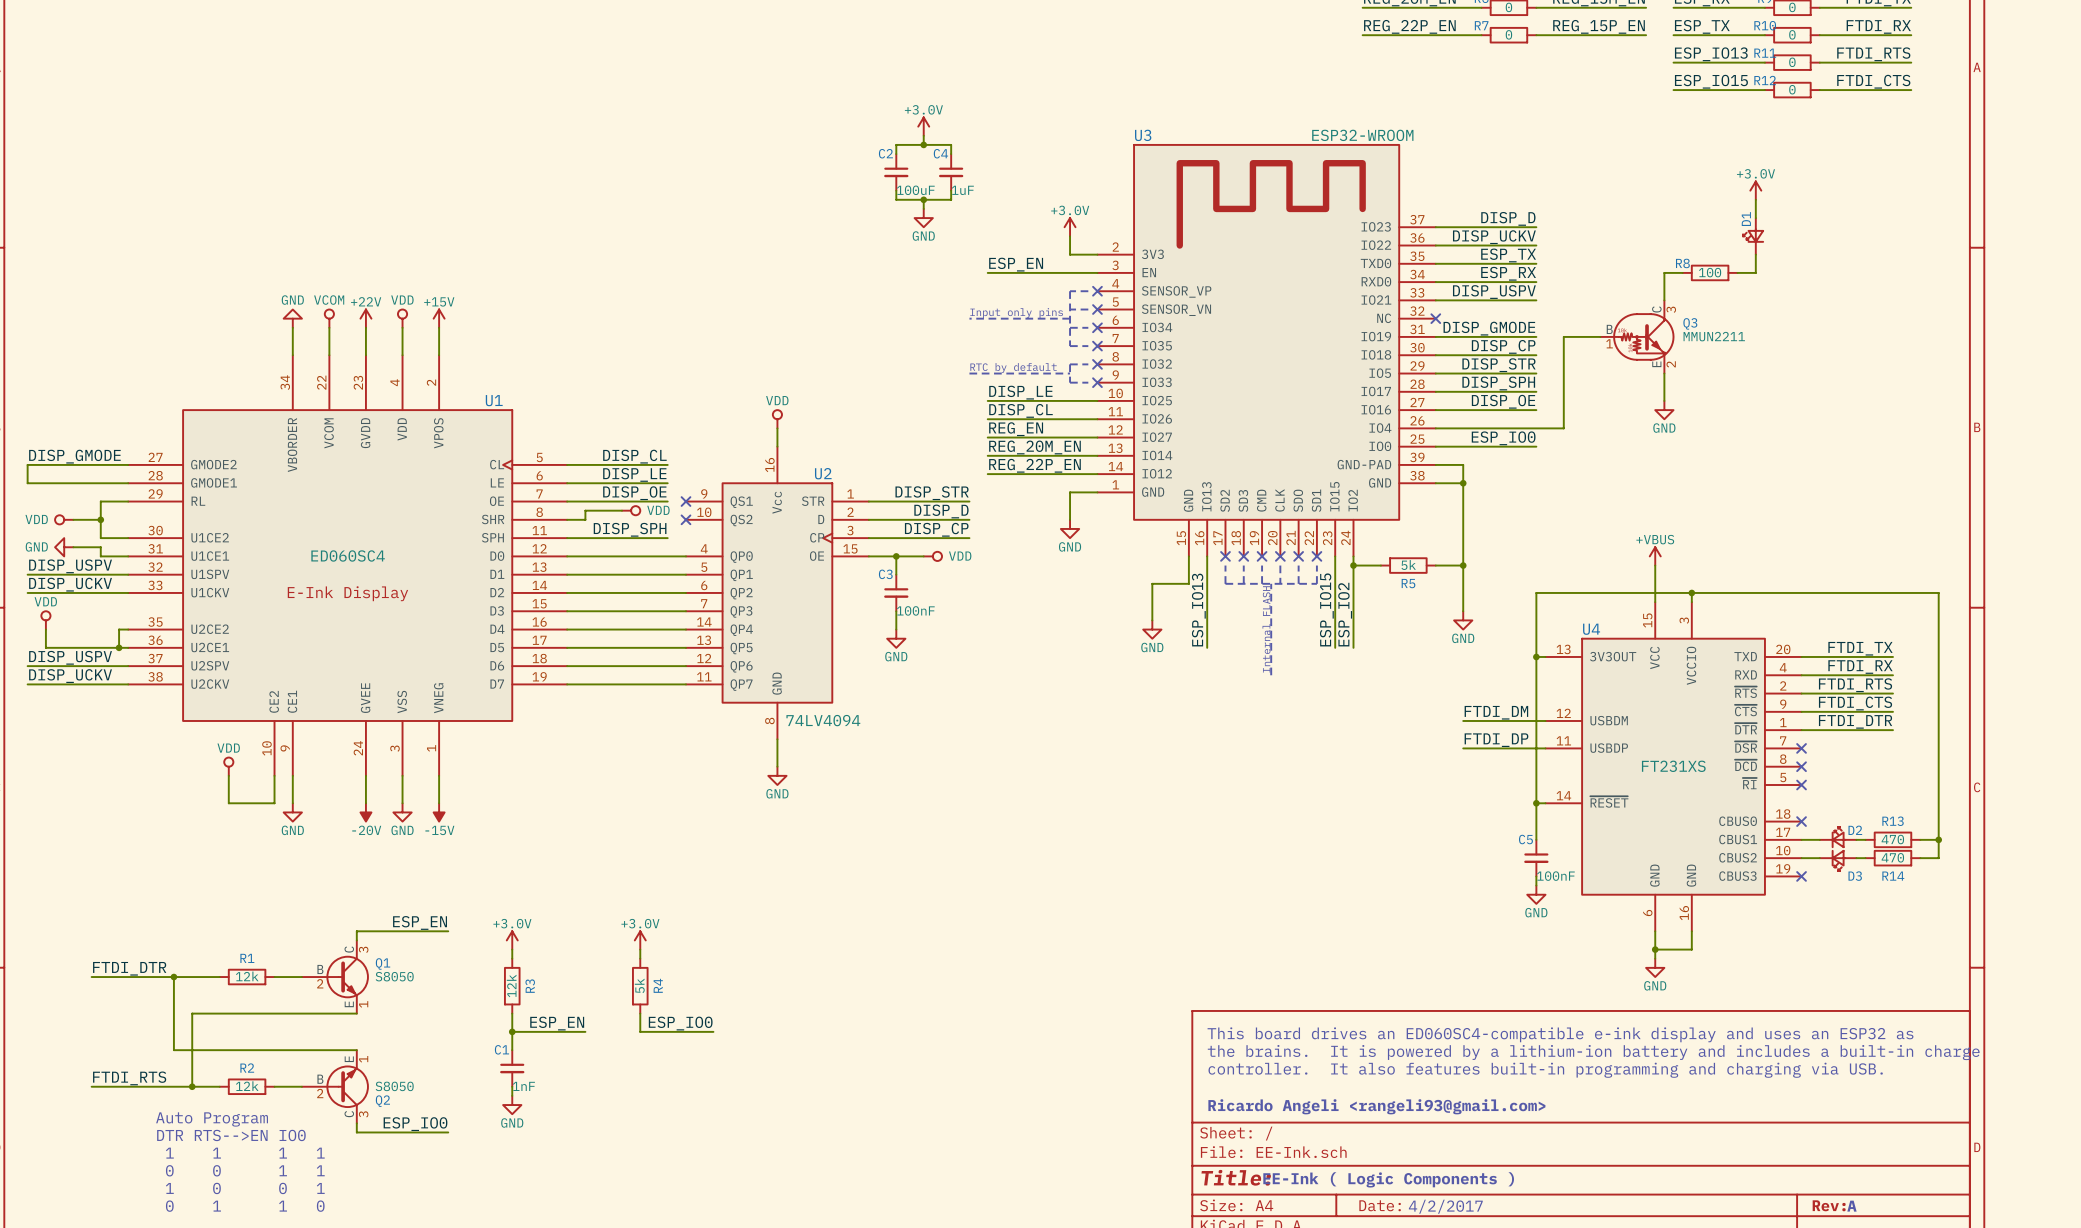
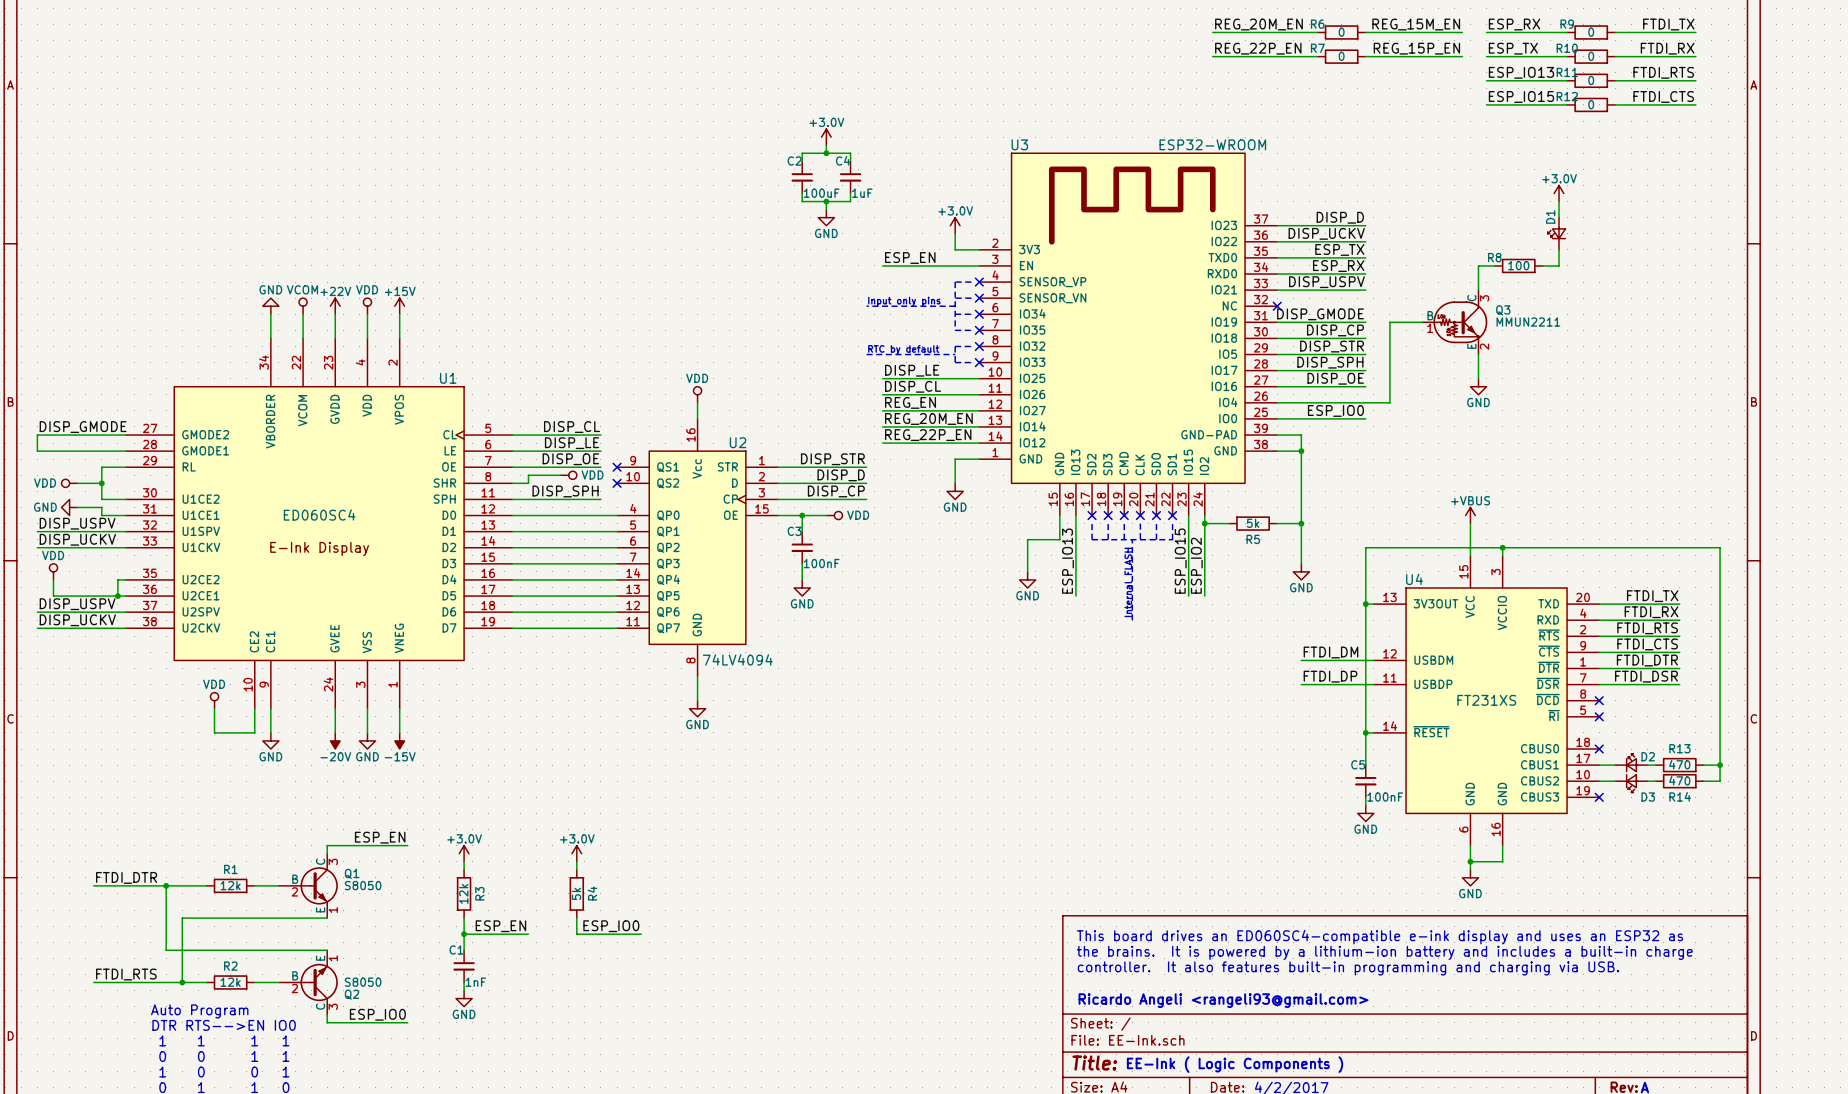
label: none -> FTDI_DSR (1646, 676)
wire: none -> (1599, 684) (1679, 684)
no-connect mark: (1801, 748) -> none

